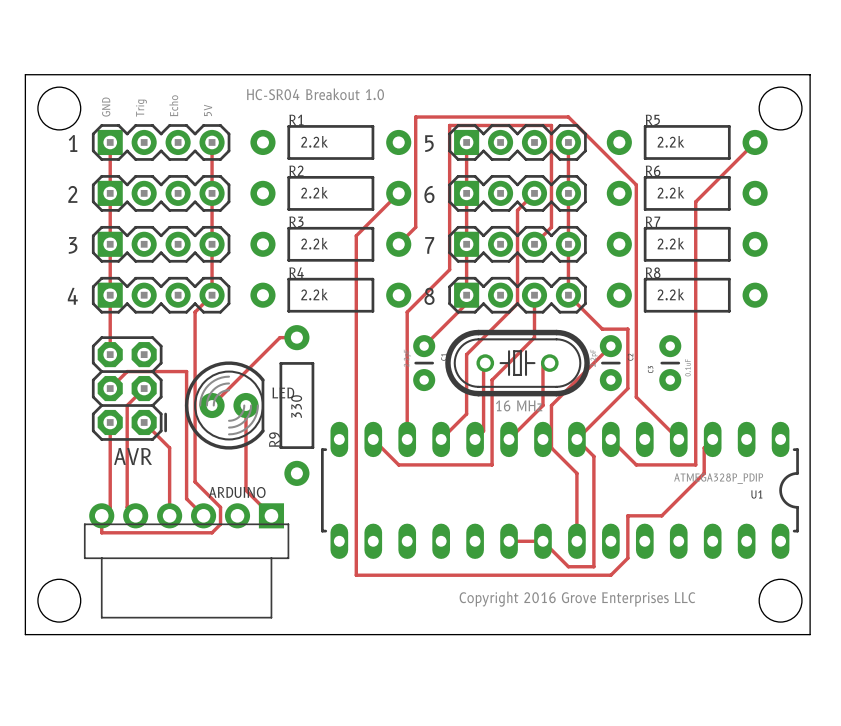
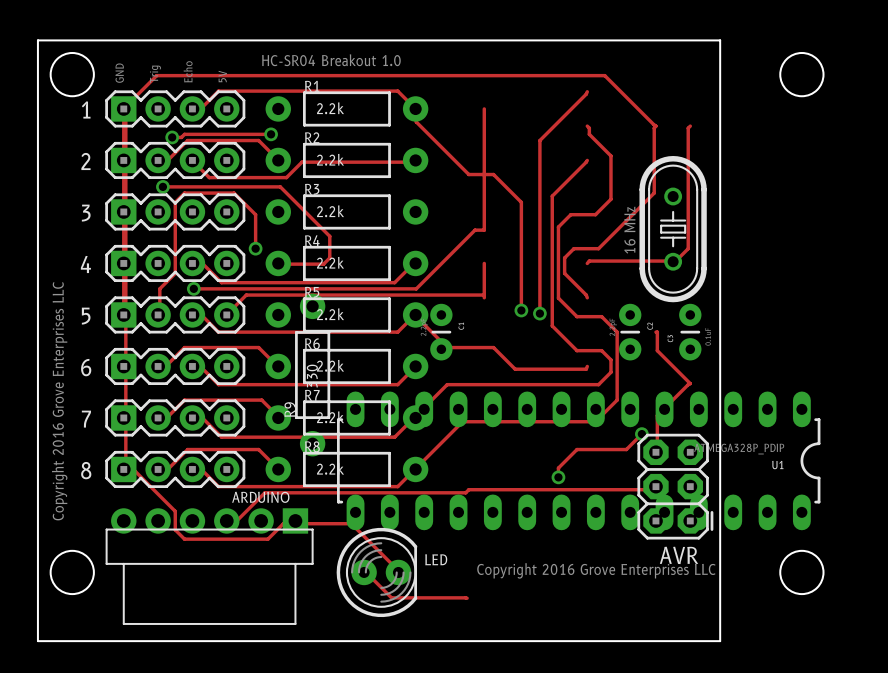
board edge: (699, 74) (810, 74) (810, 634) (25, 634) -> (720, 40) (720, 641) (37, 641) (37, 606)
track: none -> (587, 91) (539, 140) (539, 313)
track: none -> (192, 108) (193, 106) (203, 106) (218, 91) (397, 91) (416, 109) (416, 121) (468, 174) (493, 174) (521, 202) (521, 310)
track: (212, 142) (212, 295) (195, 312) (195, 481) (220, 507) (220, 524) (212, 532) (101, 532) (101, 515) (110, 507) (110, 422) -> none
5 position: (517, 142) -> (175, 314)
track: (568, 142) (568, 295) (602, 329) (627, 329) (627, 388) (576, 439) (593, 456) (593, 566) (568, 566) (542, 541) (509, 541) -> none
R5 position: (687, 142) -> (346, 314)
track: (755, 142) (695, 201) (695, 464) (636, 464) (610, 439) -> none
track: none -> (587, 126) (589, 134) (610, 155) (610, 199) (595, 214) (570, 214) (558, 227) (558, 298) (576, 316) (601, 316) (617, 332) (617, 400) (595, 421) (462, 421) (397, 486) (218, 486) (203, 471) (192, 469)
track: none -> (690, 126) (688, 128) (688, 248) (673, 261) (589, 261) (587, 263)
track: none -> (271, 134) (184, 134) (181, 137) (172, 137)
via: none -> (271, 134)
via: none -> (172, 137)
track: none -> (158, 160) (169, 159) (187, 140) (258, 140) (278, 160)
track: none -> (192, 160) (209, 177) (286, 177) (301, 162) (413, 162) (415, 160)
track: (398, 193) (356, 235) (356, 575) (610, 575) (627, 558) (627, 515) (634, 515) -> (226, 520) (237, 520) (264, 492) (465, 492) (468, 489) (651, 489) (654, 486)
6 position: (517, 193) -> (175, 366)
track: (534, 193) (517, 210) (517, 303) (466, 354) (466, 414) (441, 439) -> none
track: none -> (587, 160) (552, 196) (552, 325) (576, 350) (601, 350) (610, 359) (610, 372) (598, 384) (447, 384) (394, 437) (221, 437) (203, 418) (192, 417)
R6 position: (687, 193) -> (346, 366)
track: none -> (162, 186) (280, 186) (329, 236) (329, 257) (323, 264) (278, 263)
via: none -> (162, 186)
track: (398, 244) (415, 227) (415, 117) (568, 117) (636, 184) (636, 397) (678, 439) -> none
7 position: (517, 244) -> (175, 417)
track: (534, 244) (551, 227) (551, 125) (449, 125) (449, 269) (407, 312) (407, 439) -> none
R7 position: (687, 244) -> (346, 417)
track: (466, 262) (466, 295) -> (484, 230) (475, 230) (416, 288) (193, 288)
track: none -> (255, 248) (255, 214) (233, 193) (184, 193) (175, 202) (175, 273) (159, 288) (159, 313) (158, 314)
via: none -> (255, 248)
track: none -> (192, 263) (203, 264) (221, 282) (394, 282) (415, 263)
8 position: (517, 295) -> (175, 469)
track: (534, 295) (534, 337) (492, 380) (492, 464) (398, 464) (373, 439) -> none
R8 position: (687, 295) -> (346, 469)
track: (466, 303) (424, 346) -> (484, 272) (484, 297)
via: none -> (193, 288)
track: none -> (484, 295) (246, 295) (226, 314)
track: none -> (587, 297) (564, 273) (564, 257) (573, 248) (598, 248) (654, 193) (654, 128) (655, 126) (604, 75) (156, 75) (123, 108) (125, 109) (125, 159) (123, 160) (125, 162) (125, 211) (123, 211) (125, 214) (125, 261) (123, 263) (125, 264) (125, 313) (123, 314) (125, 316) (125, 366) (123, 366) (125, 369) (125, 415) (123, 417) (125, 418) (125, 468) (123, 469) (135, 471) (175, 511) (175, 529) (184, 539) (267, 539) (283, 523) (292, 523) (295, 520) (295, 523) (351, 523) (398, 572)
track: (296, 337) (279, 337) (212, 405) -> none
via: none -> (521, 310)
via: none -> (539, 313)
track: none -> (192, 314) (203, 316) (218, 332) (397, 332) (415, 314) (447, 347) (493, 347) (515, 369) (586, 369) (587, 366)
track: (610, 346) (551, 405) (551, 447) -> none
track: (485, 363) (483, 363) (483, 430) (475, 439) -> none
part rotation: 0° (517, 363) -> 90° clockwise (673, 229)
part position: (517, 363) -> (673, 229)
track: (549, 363) (542, 363) (542, 405) (509, 439) -> none
track: none -> (655, 332) (657, 350) (690, 383) (657, 415) (655, 452)
track: (110, 388) (127, 371) (186, 371) (186, 498) (203, 515) -> none
AVR: (129, 388) -> none
track: (144, 388) (127, 405) (127, 507) (135, 515) -> none
track: none -> (158, 366) (166, 366) (184, 347) (258, 347) (278, 366)
track: none -> (192, 366) (193, 369) (203, 369) (218, 384) (397, 384) (415, 366)
LED position: (224, 405) -> (376, 572)
track: (245, 405) (245, 490) (271, 515) -> none
track: (144, 422) (169, 447) (169, 515) -> none
text: none -> Copyright 2016 Grove Enterprises LLC (59, 401)
track: (542, 439) (576, 473) (576, 541) -> none
track: (712, 439) (704, 447) (704, 473) (661, 515) (636, 515) -> none
track: none -> (158, 417) (159, 415) (169, 415) (184, 400) (261, 400) (278, 417)
track: none -> (641, 434) (626, 449) (576, 449) (558, 468) (558, 477)
via: none -> (641, 434)
track: none -> (158, 469) (169, 468) (187, 449) (258, 449) (278, 469)
via: none -> (558, 477)
AVR: none -> (675, 486)
ARDUINO position: (186, 560) -> (209, 566)
track: none -> (364, 572) (391, 597) (467, 598)

